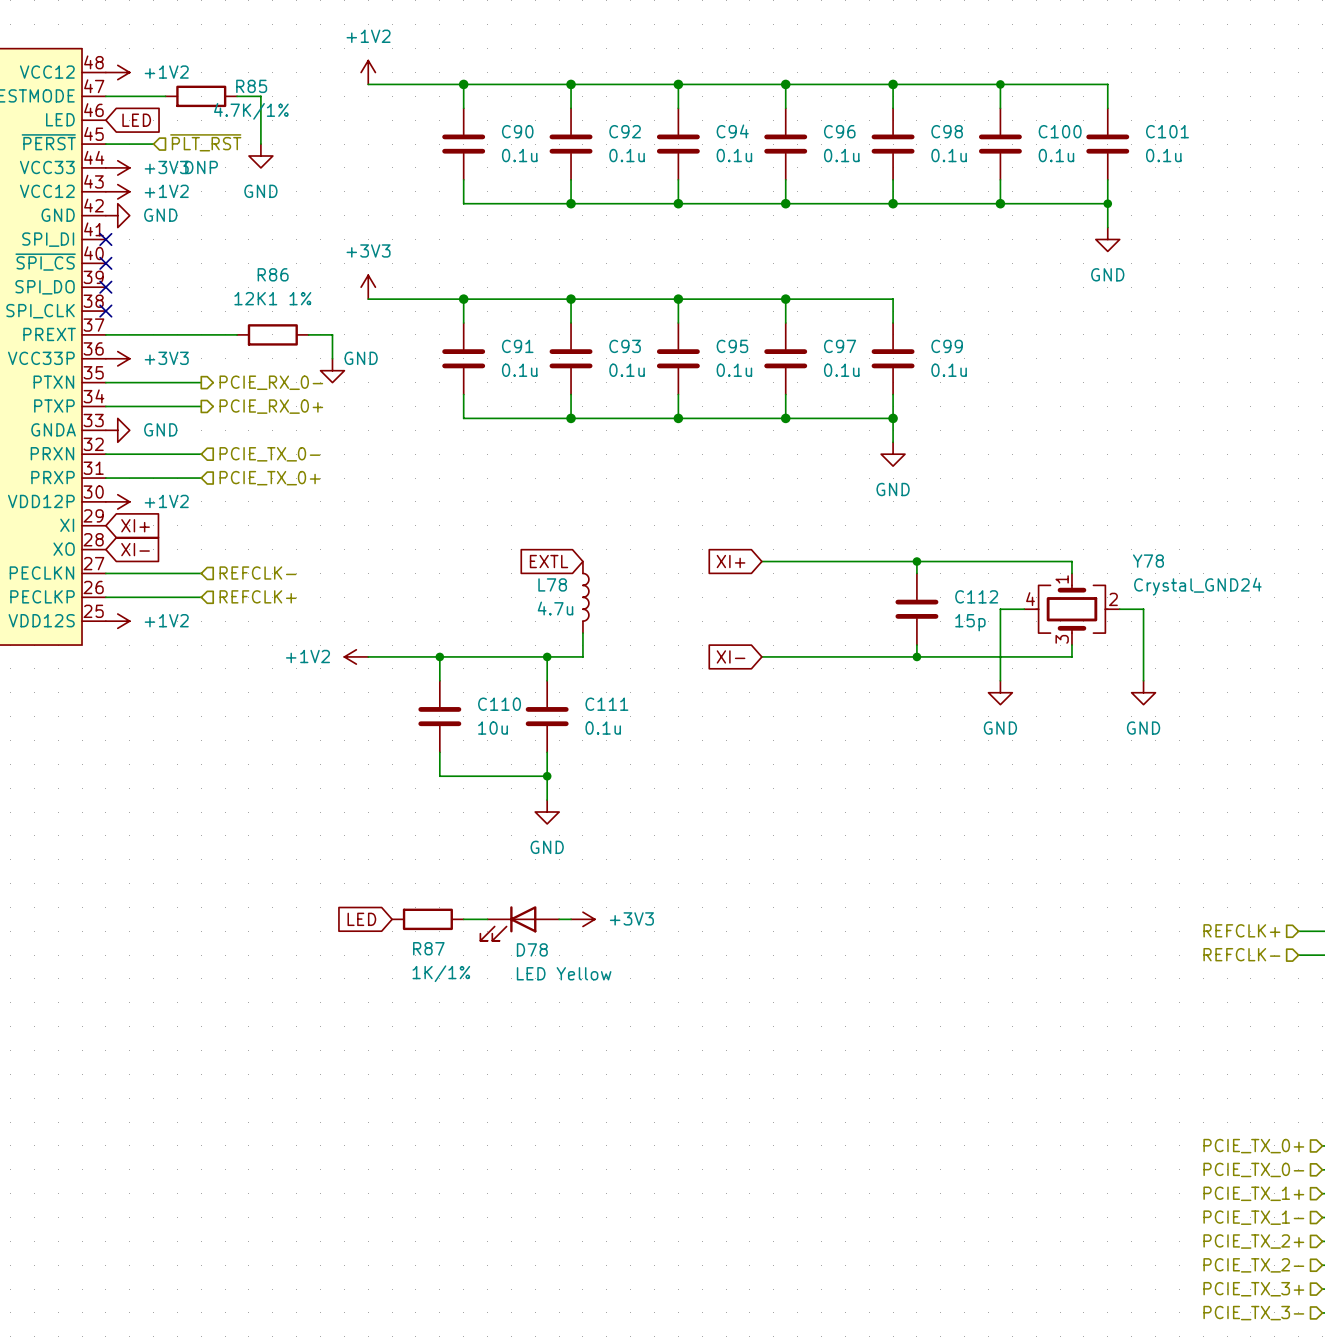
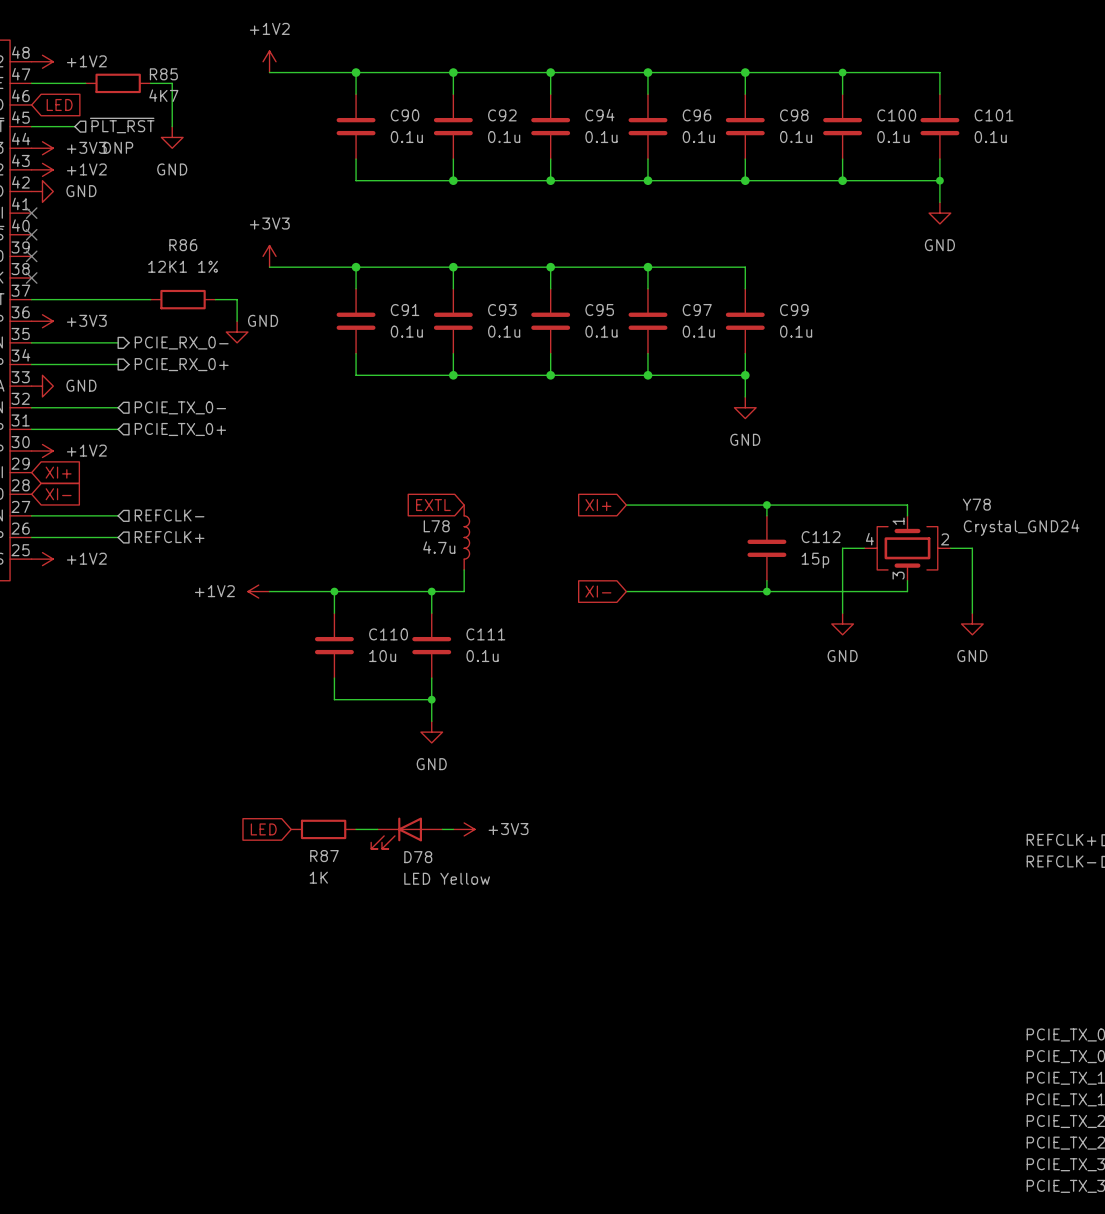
R85 value: 4.7K/1% (251, 111) -> 4K7 (163, 95)
R87 value: 1K/1% (441, 973) -> 1K (318, 877)

